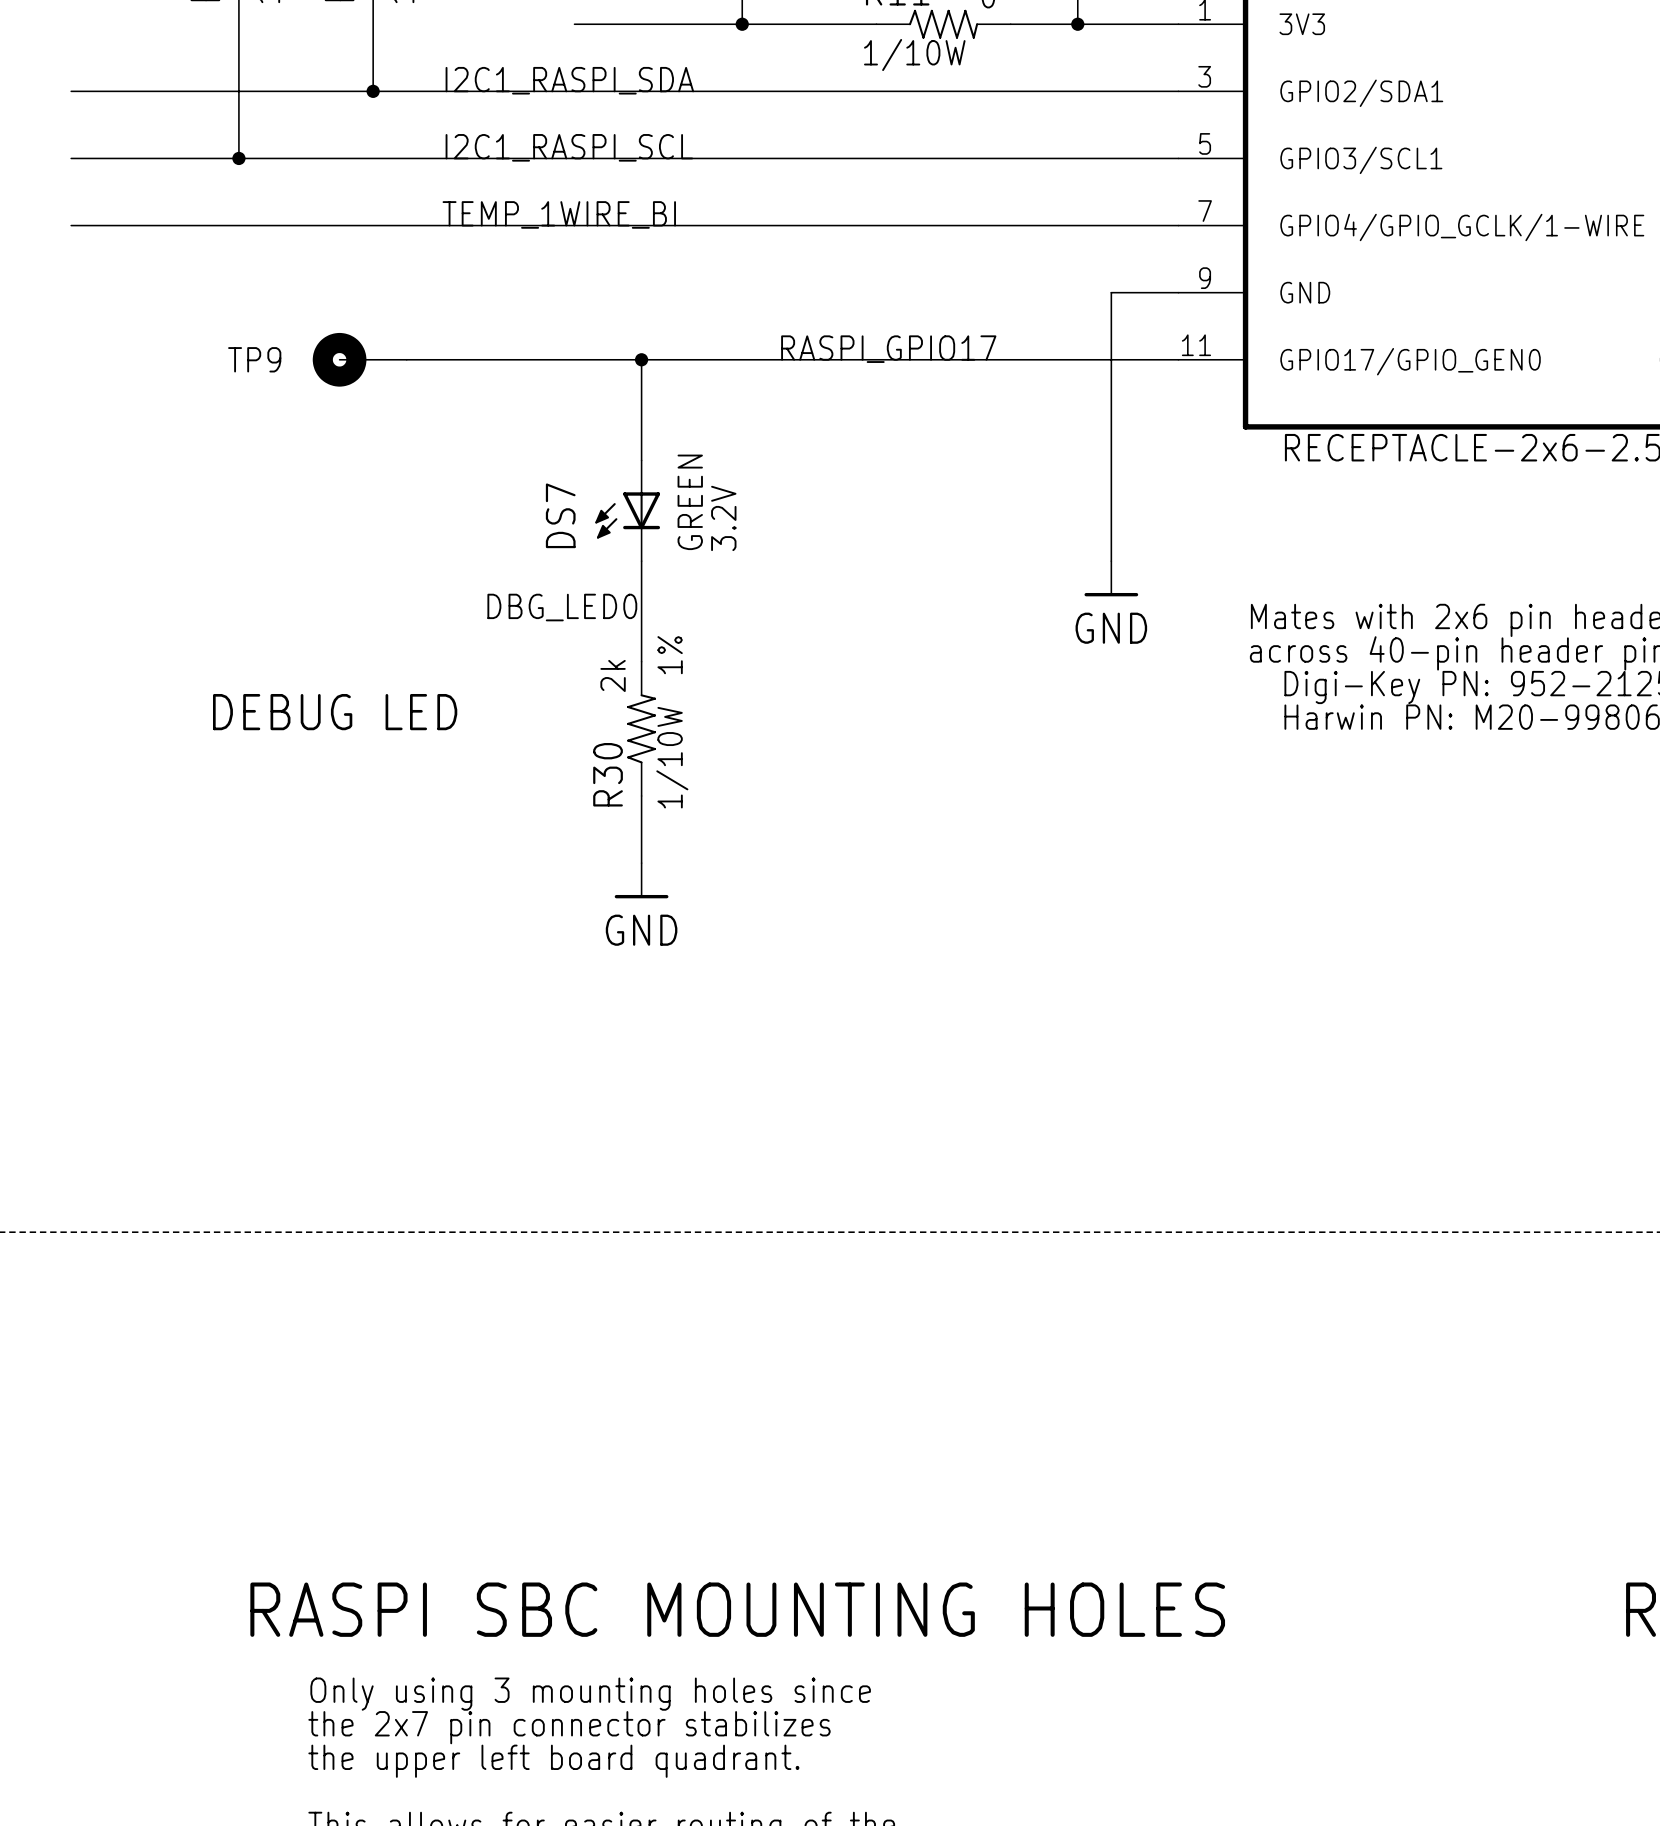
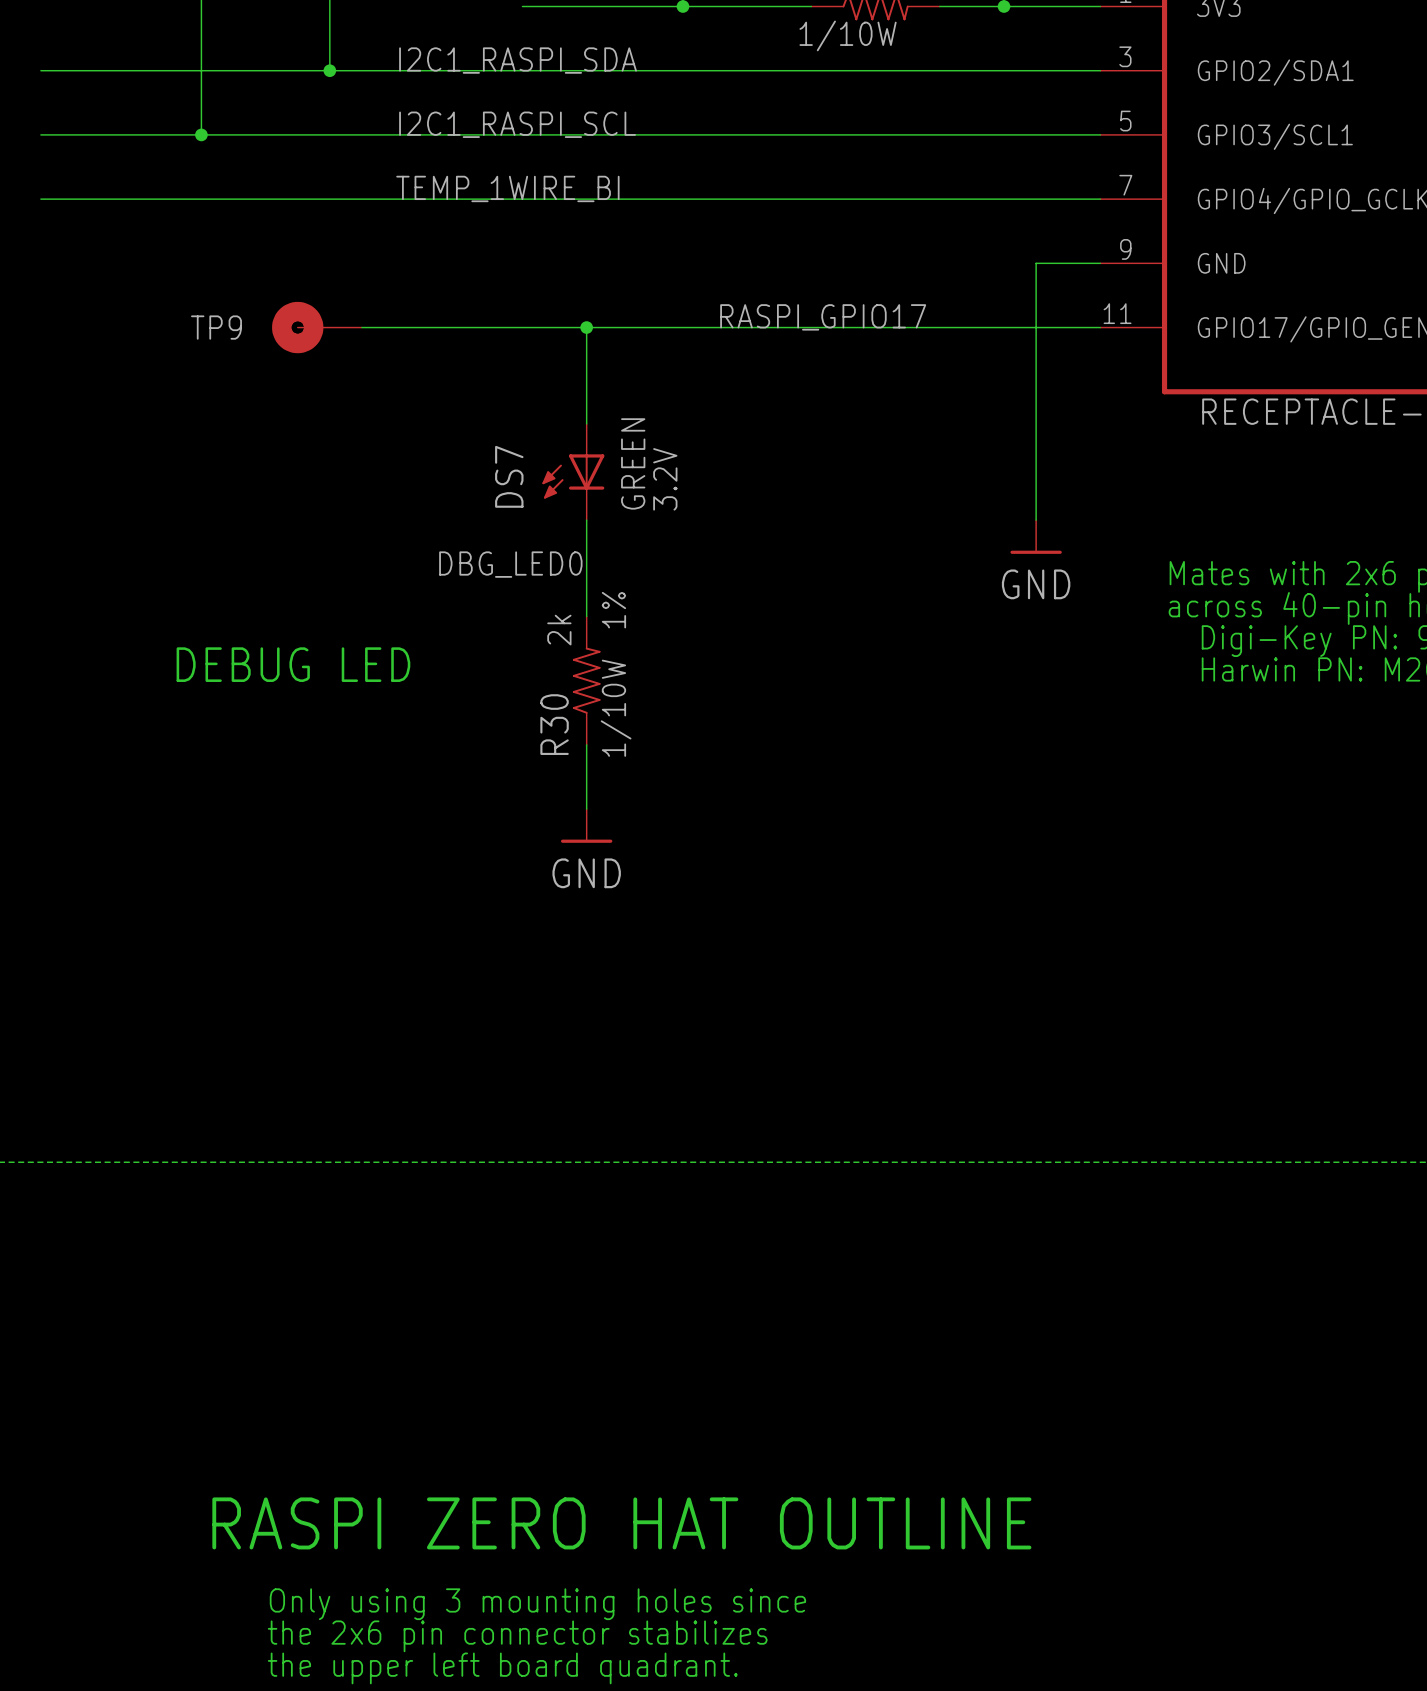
text: RASPI SBC MOUNTING HOLES (737, 1609) -> RASPI ZERO HAT OUTLINE (621, 1523)
text: the 2x7 pin connector stabilizes (569, 1727) -> the 2x6 pin connector stabilizes (517, 1636)

